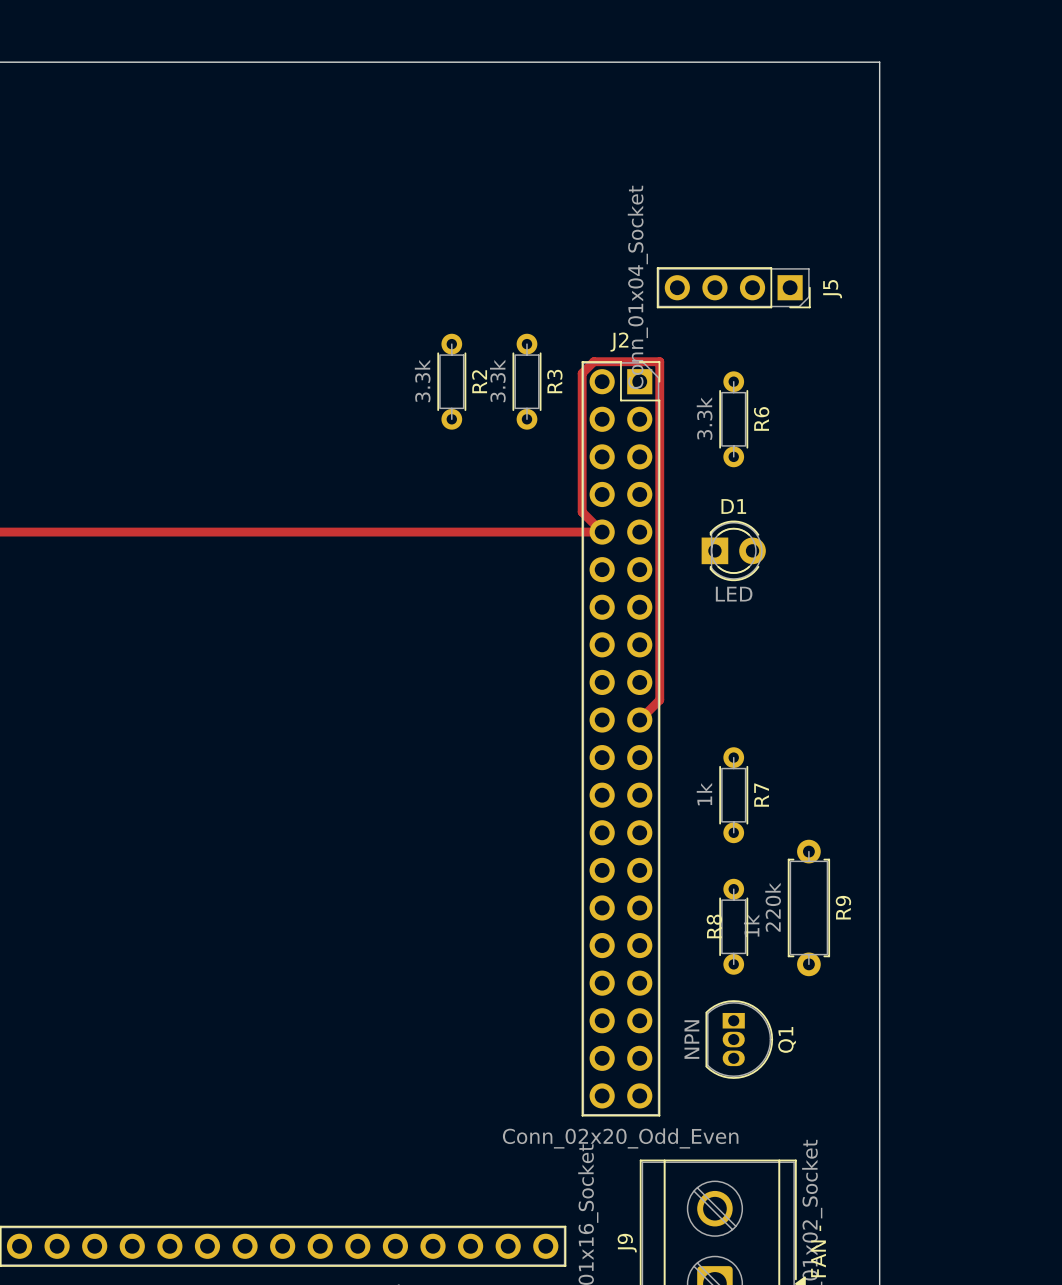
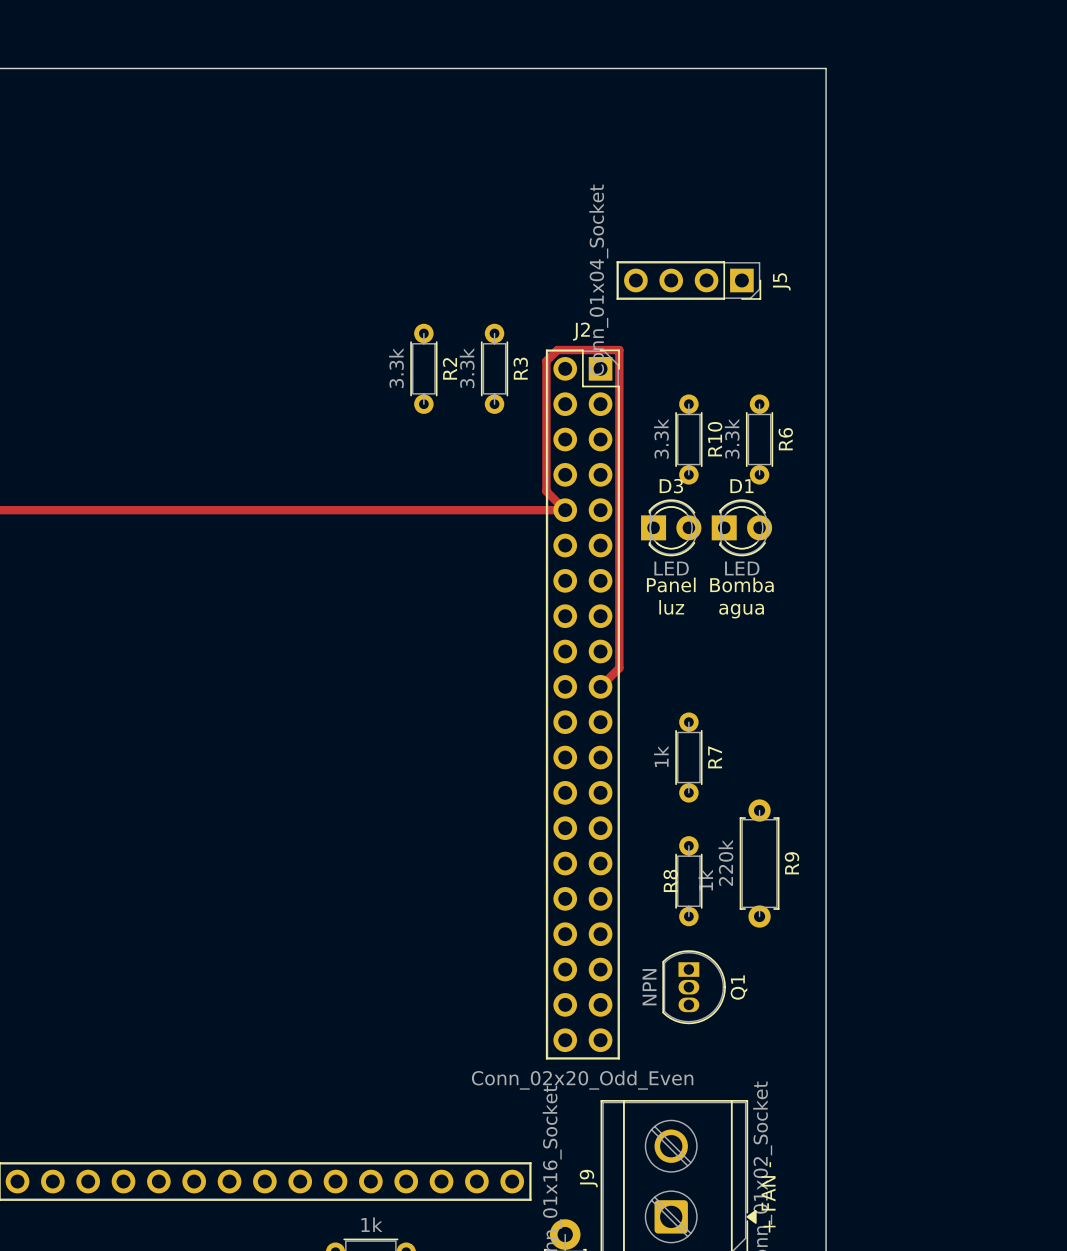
R6 position: (733, 419) -> (759, 439)
R10: none -> 3.3k (688, 439)
D3: none -> LED (671, 527)
D1 position: (733, 550) -> (741, 527)
text: none -> Panel (671, 584)
text: none -> Bomba (741, 584)
text: none -> luz (671, 607)
text: none -> agua (741, 611)

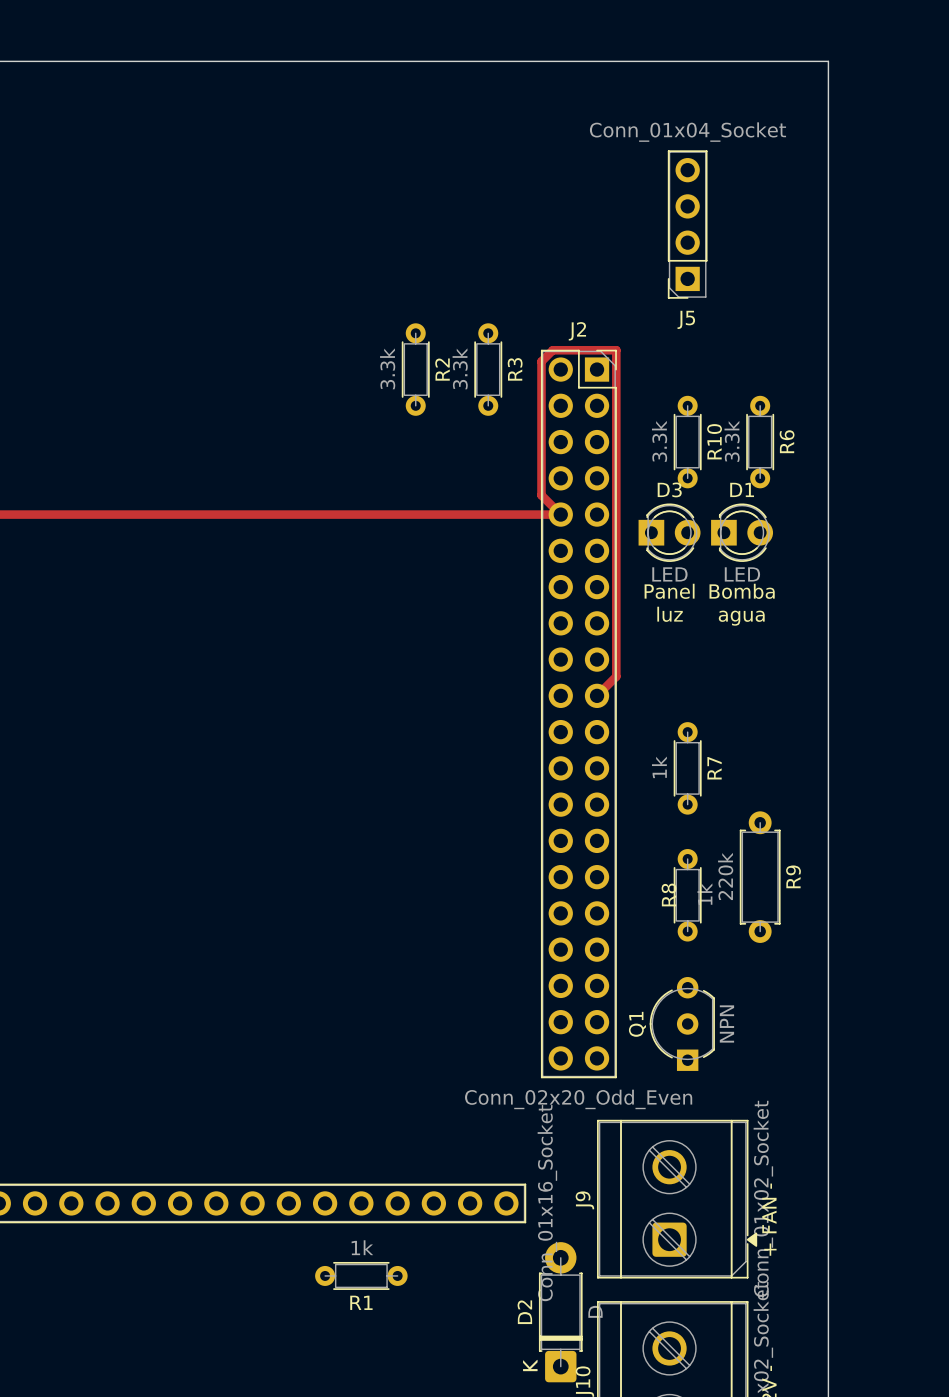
J5 rotation: 0° (688, 280) -> 90° clockwise (687, 224)
Q1 footprint: [662, 950, 726, 1025] -> [649, 977, 715, 1071]
Q1 value position: NPN (649, 987) -> NPN (726, 1023)
Q1 name position: Q1 (739, 987) -> Q1 (637, 1024)

